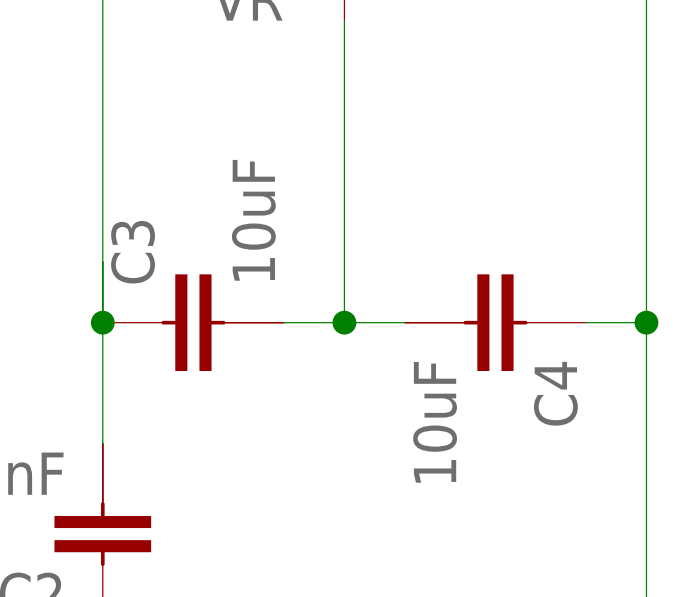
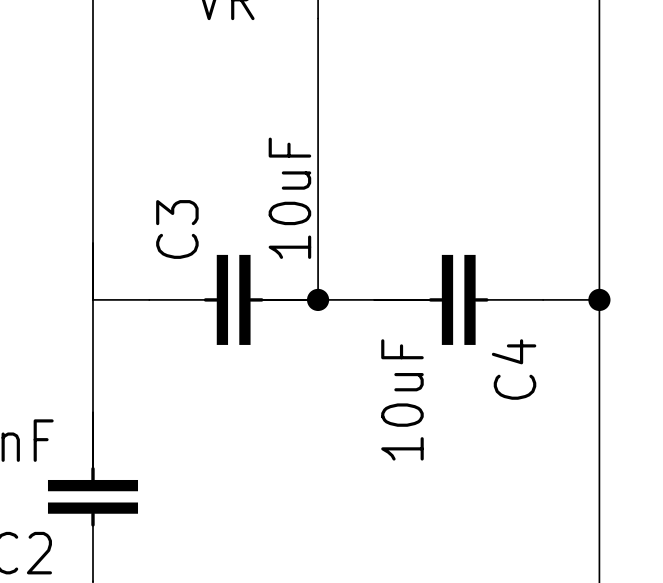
junction: (102, 322) -> none
C3 position: (193, 322) -> (233, 299)

